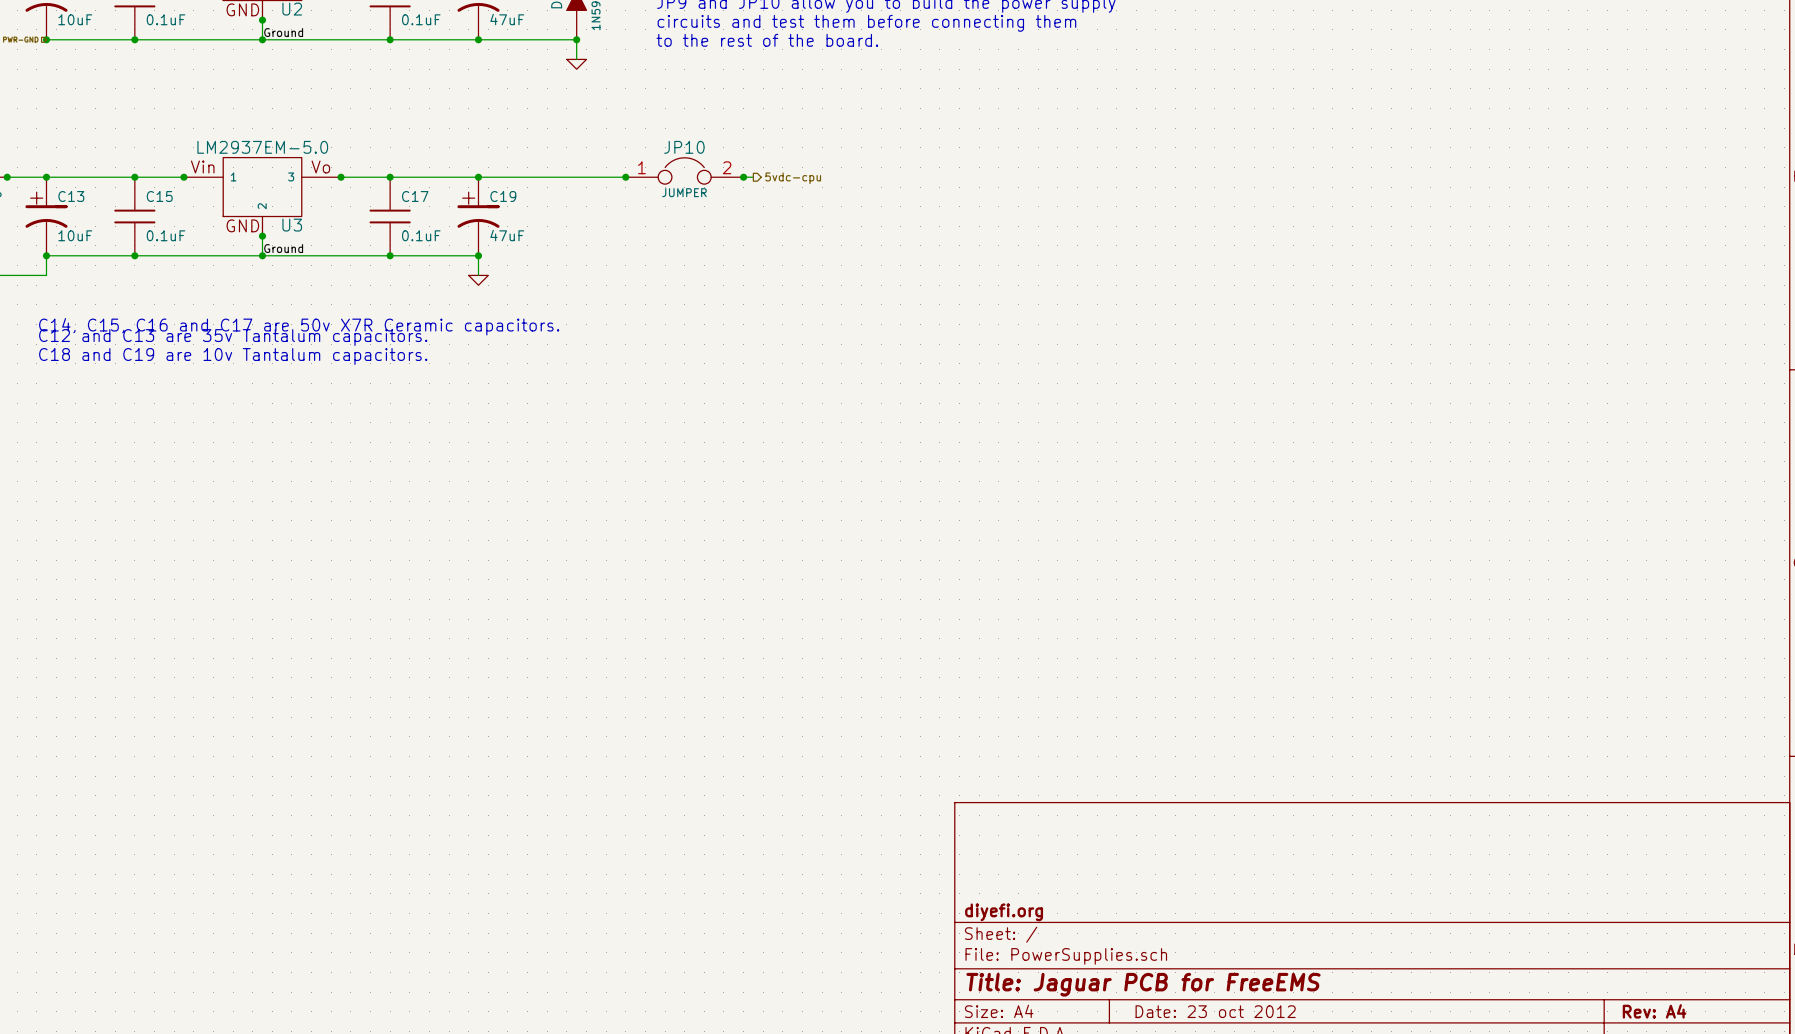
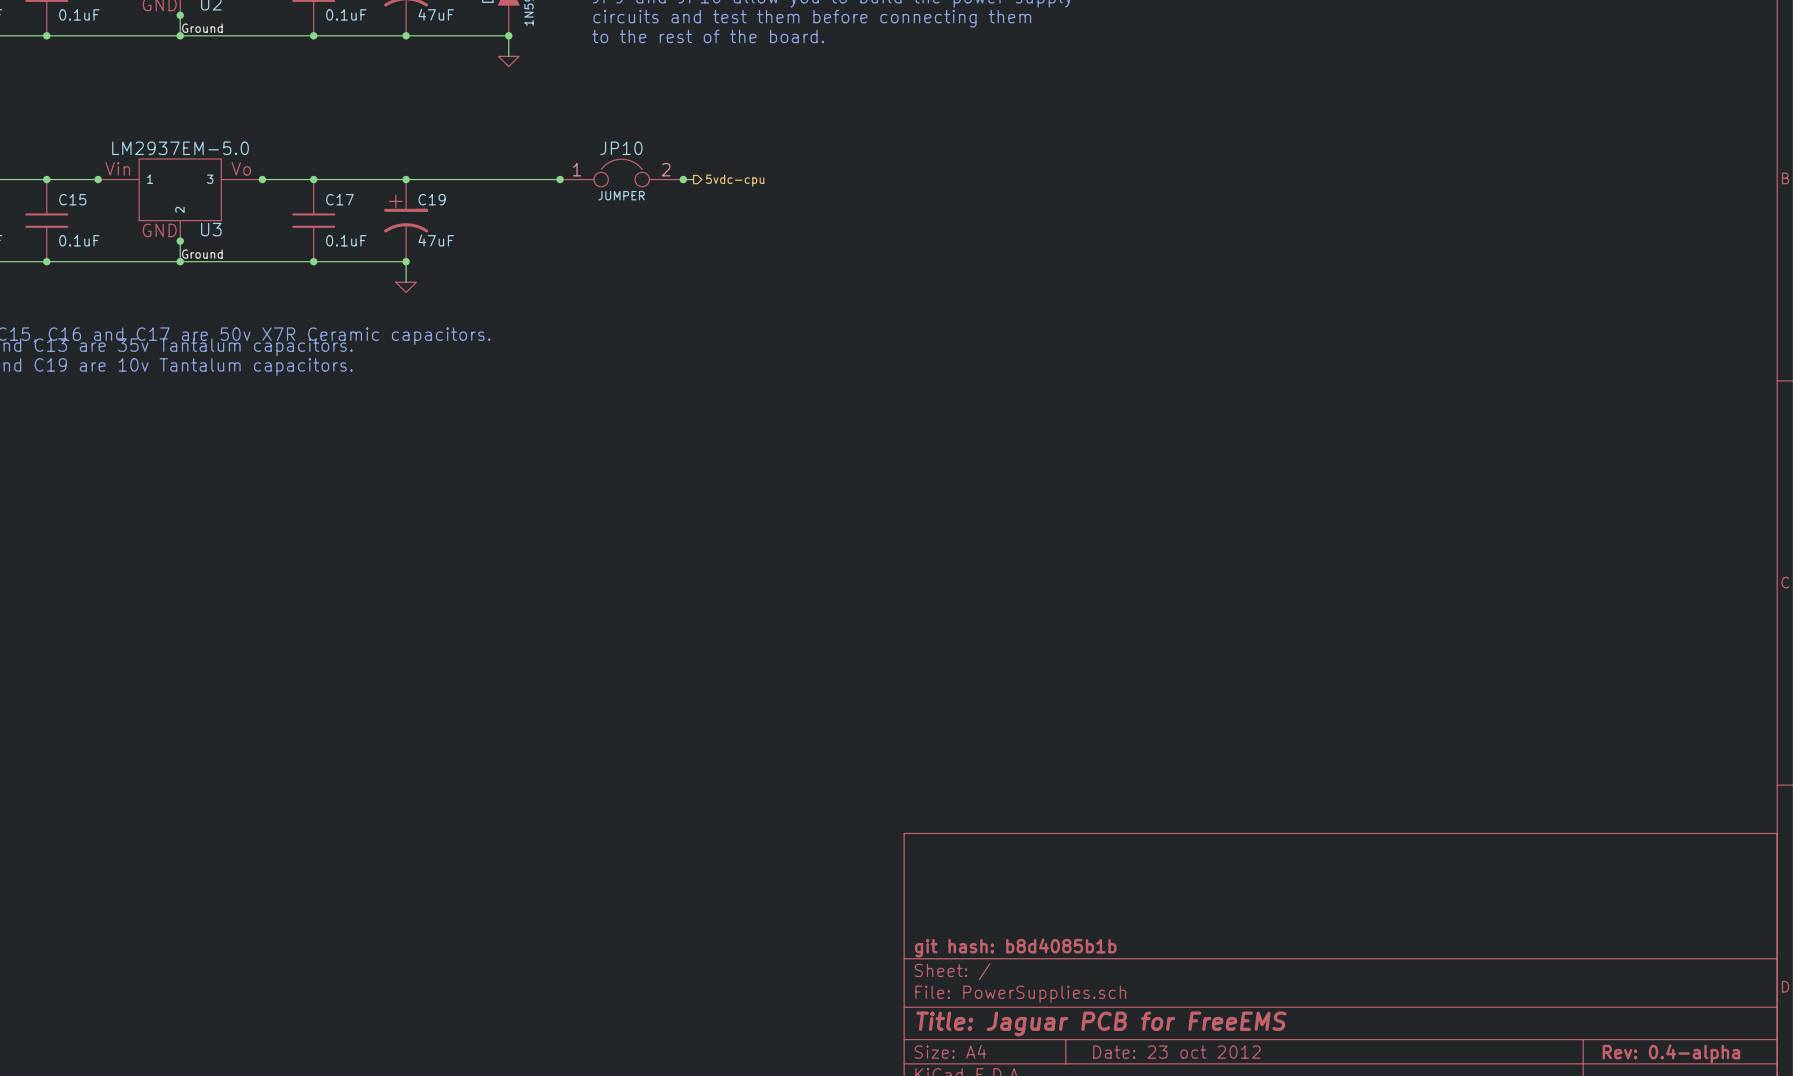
title block: diyefi.org (1004, 912) -> git hash: b8d4085b1b (1015, 947)
title block: Rev: A4 (1654, 1011) -> Rev: 0.4-alpha (1671, 1053)

